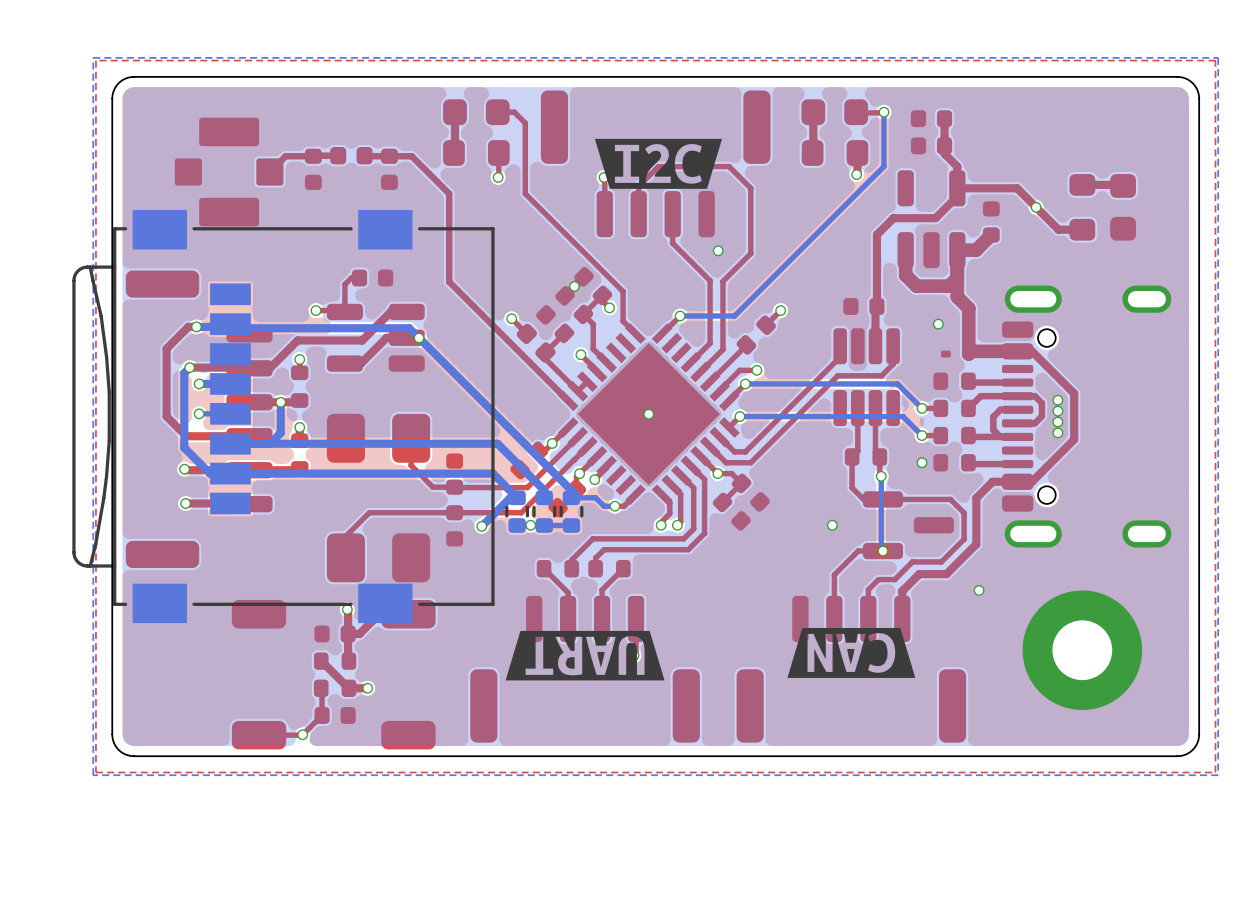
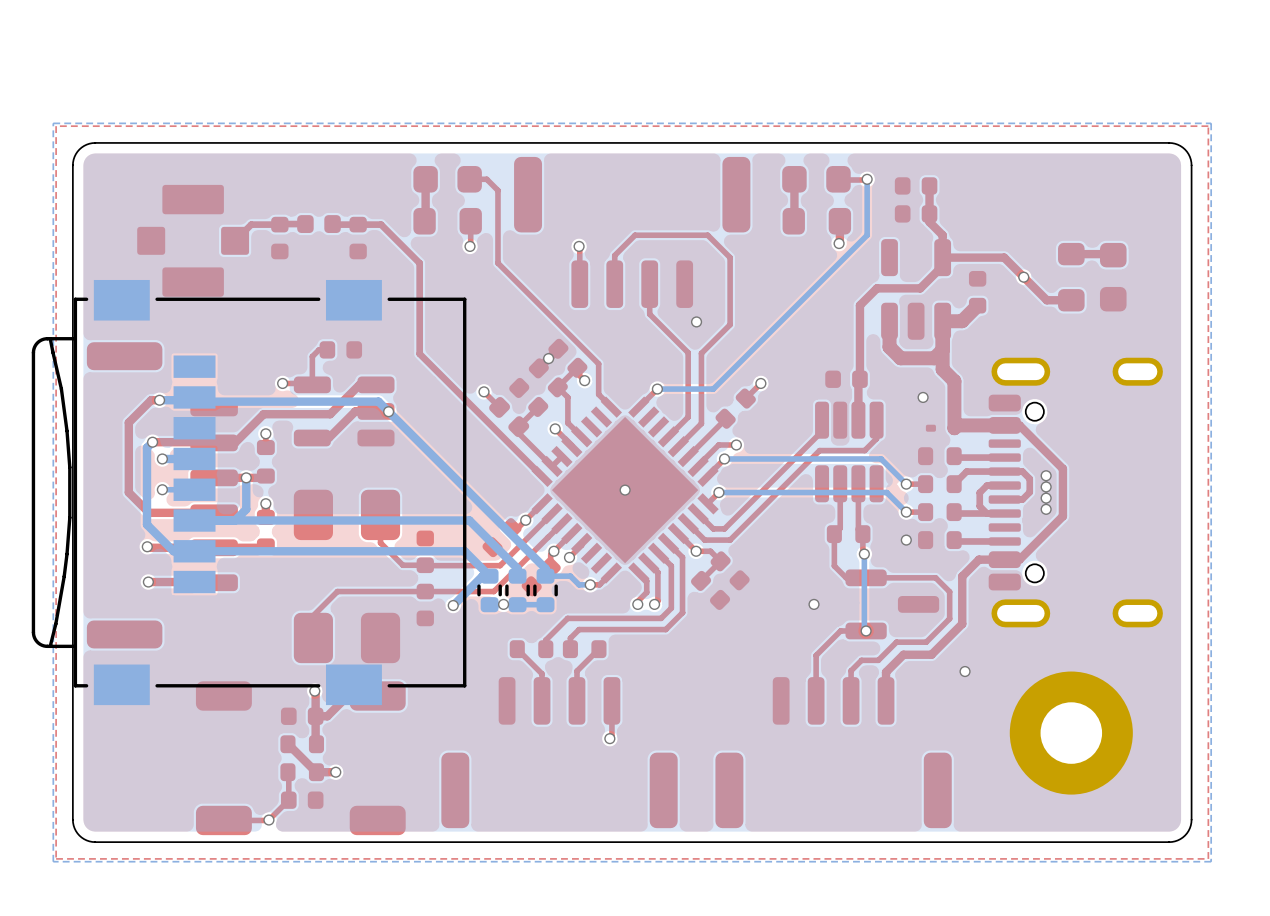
drawing: [594, 138, 723, 189] -> none
drawing: [787, 627, 916, 678] -> none
drawing: [505, 630, 665, 681] -> none

